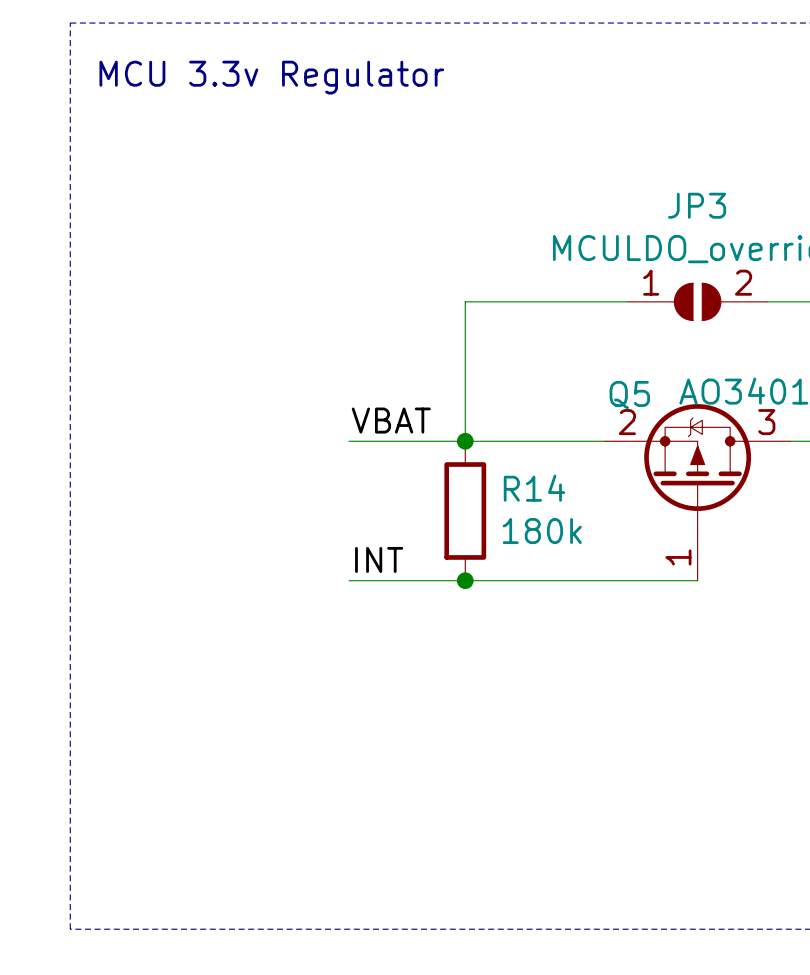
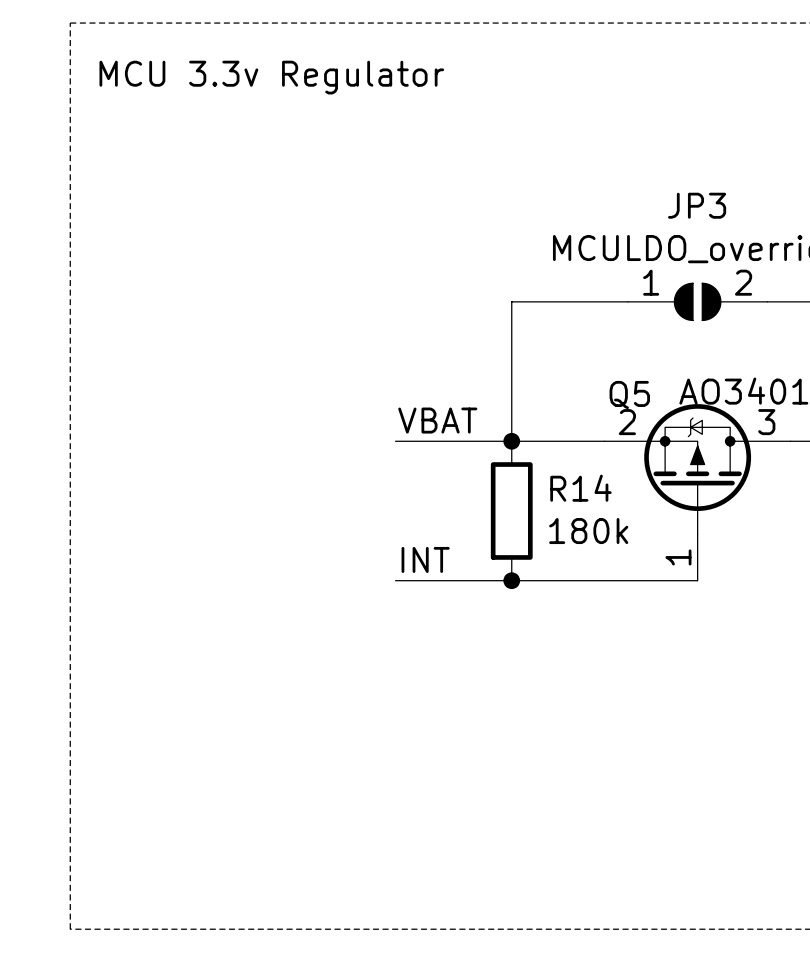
wire: (511, 301) (465, 301) (465, 441) -> (511, 301) (511, 441)
label position: VBAT (391, 420) -> VBAT (437, 420)
wire: (349, 441) (395, 441) -> none
junction position: (465, 441) -> (511, 441)
R14 position: (465, 510) -> (511, 510)
label position: INT (379, 559) -> INT (425, 559)
wire: (349, 580) (395, 580) -> none
junction position: (465, 580) -> (511, 580)

